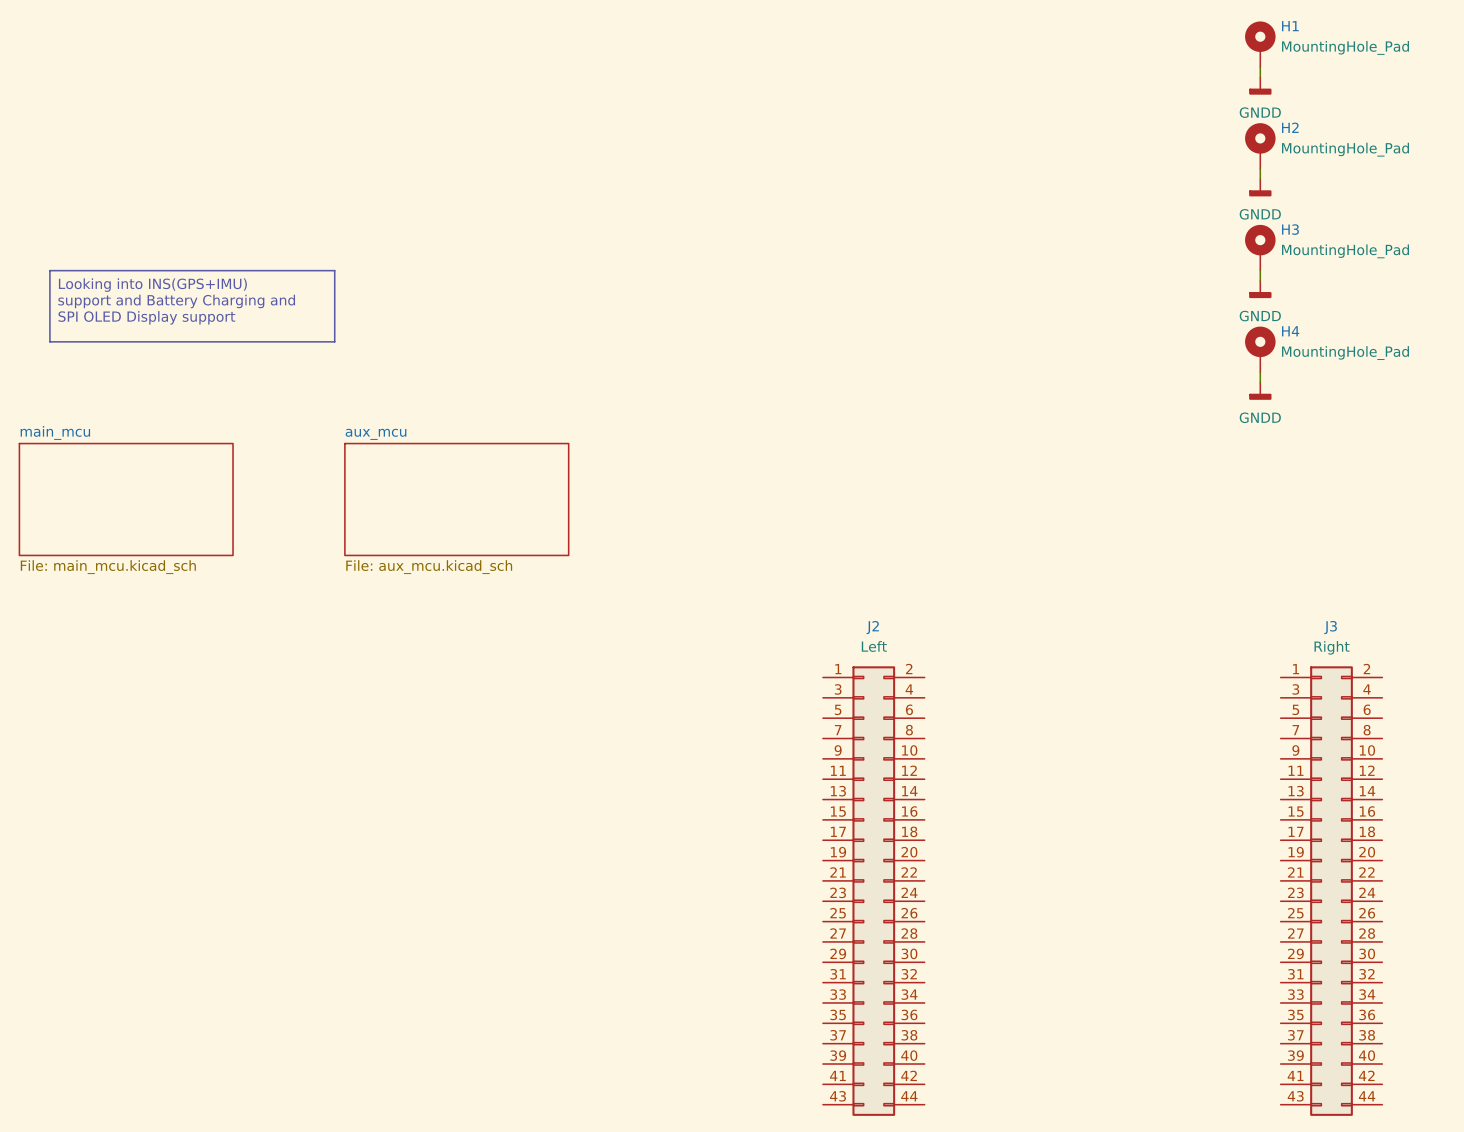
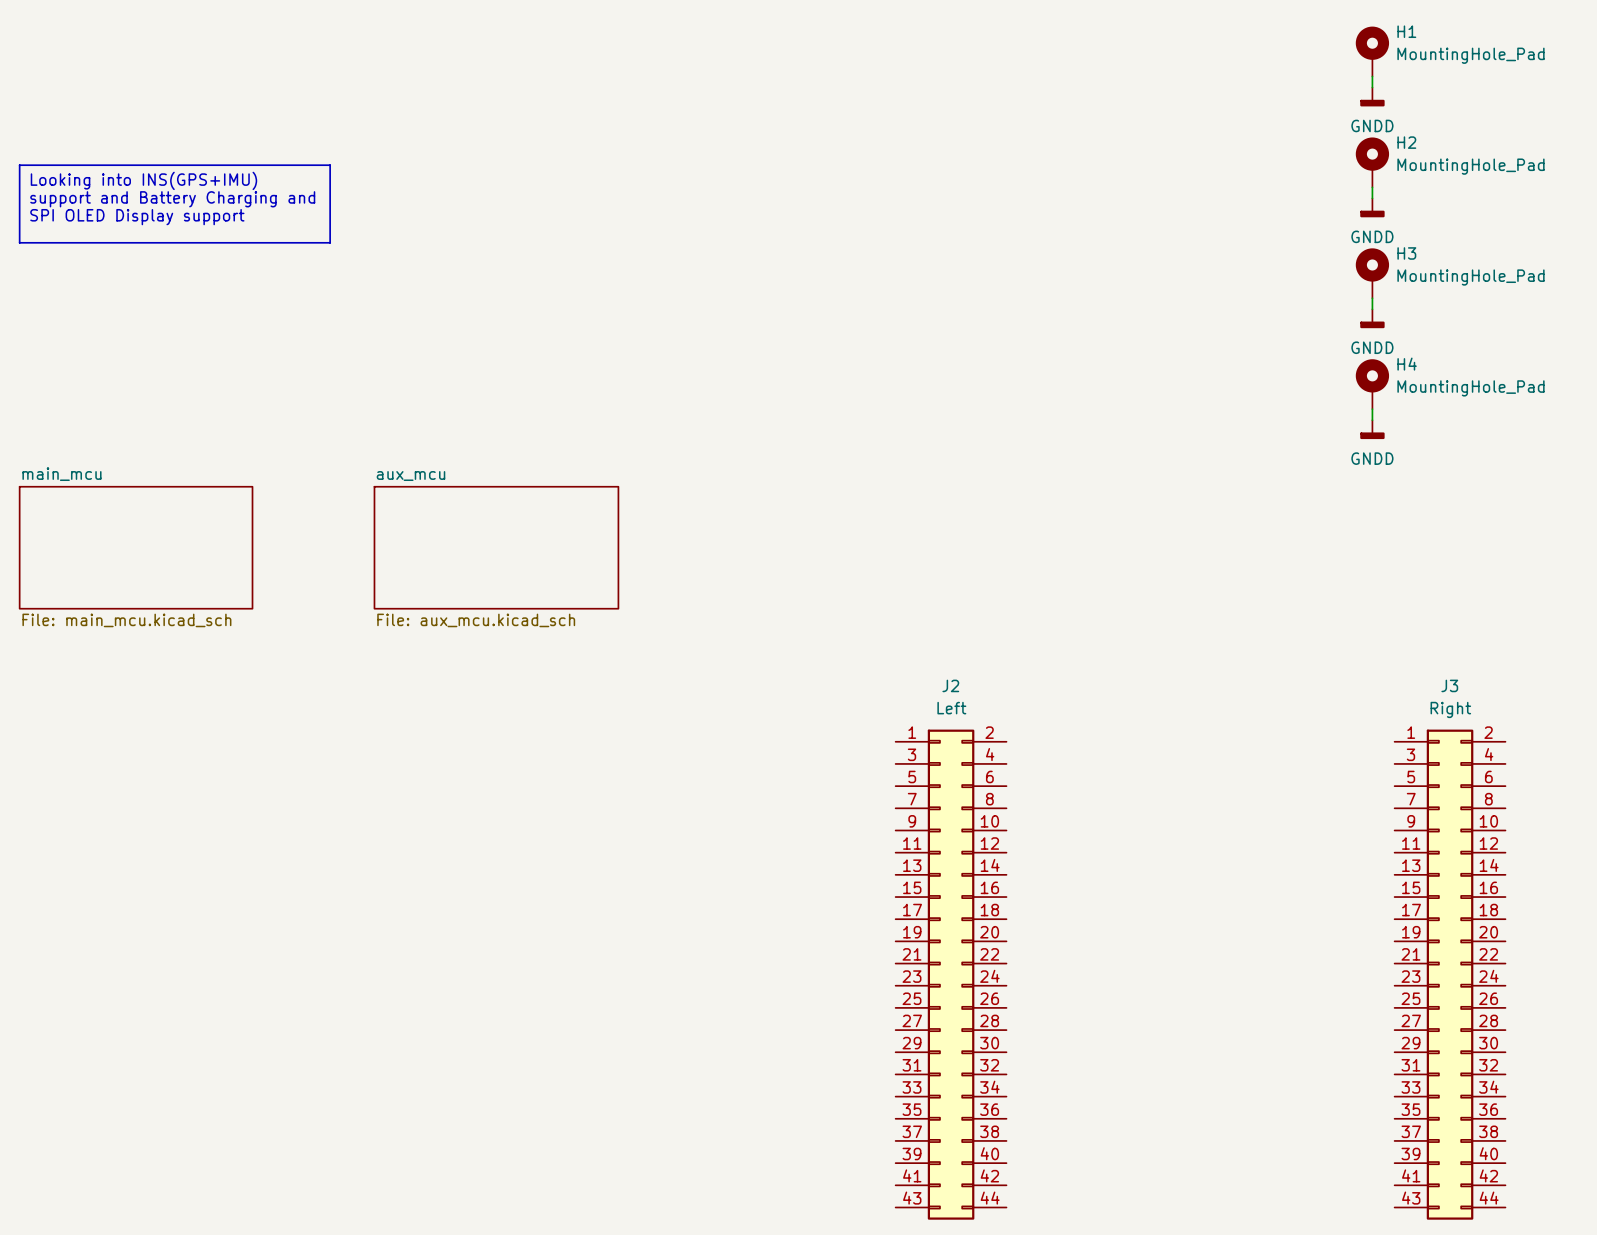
line: (49, 270) (334, 270) (334, 341) (49, 341) (49, 270) -> (19, 165) (330, 165) (330, 242) (19, 242) (19, 165)
text position: Looking into INS(GPS+IMU) (152, 285) -> Looking into INS(GPS+IMU) (143, 180)
text position: support and Battery Charging and (176, 301) -> support and Battery Charging and (172, 199)
text position: SPI OLED Display support (146, 317) -> SPI OLED Display support (137, 217)

